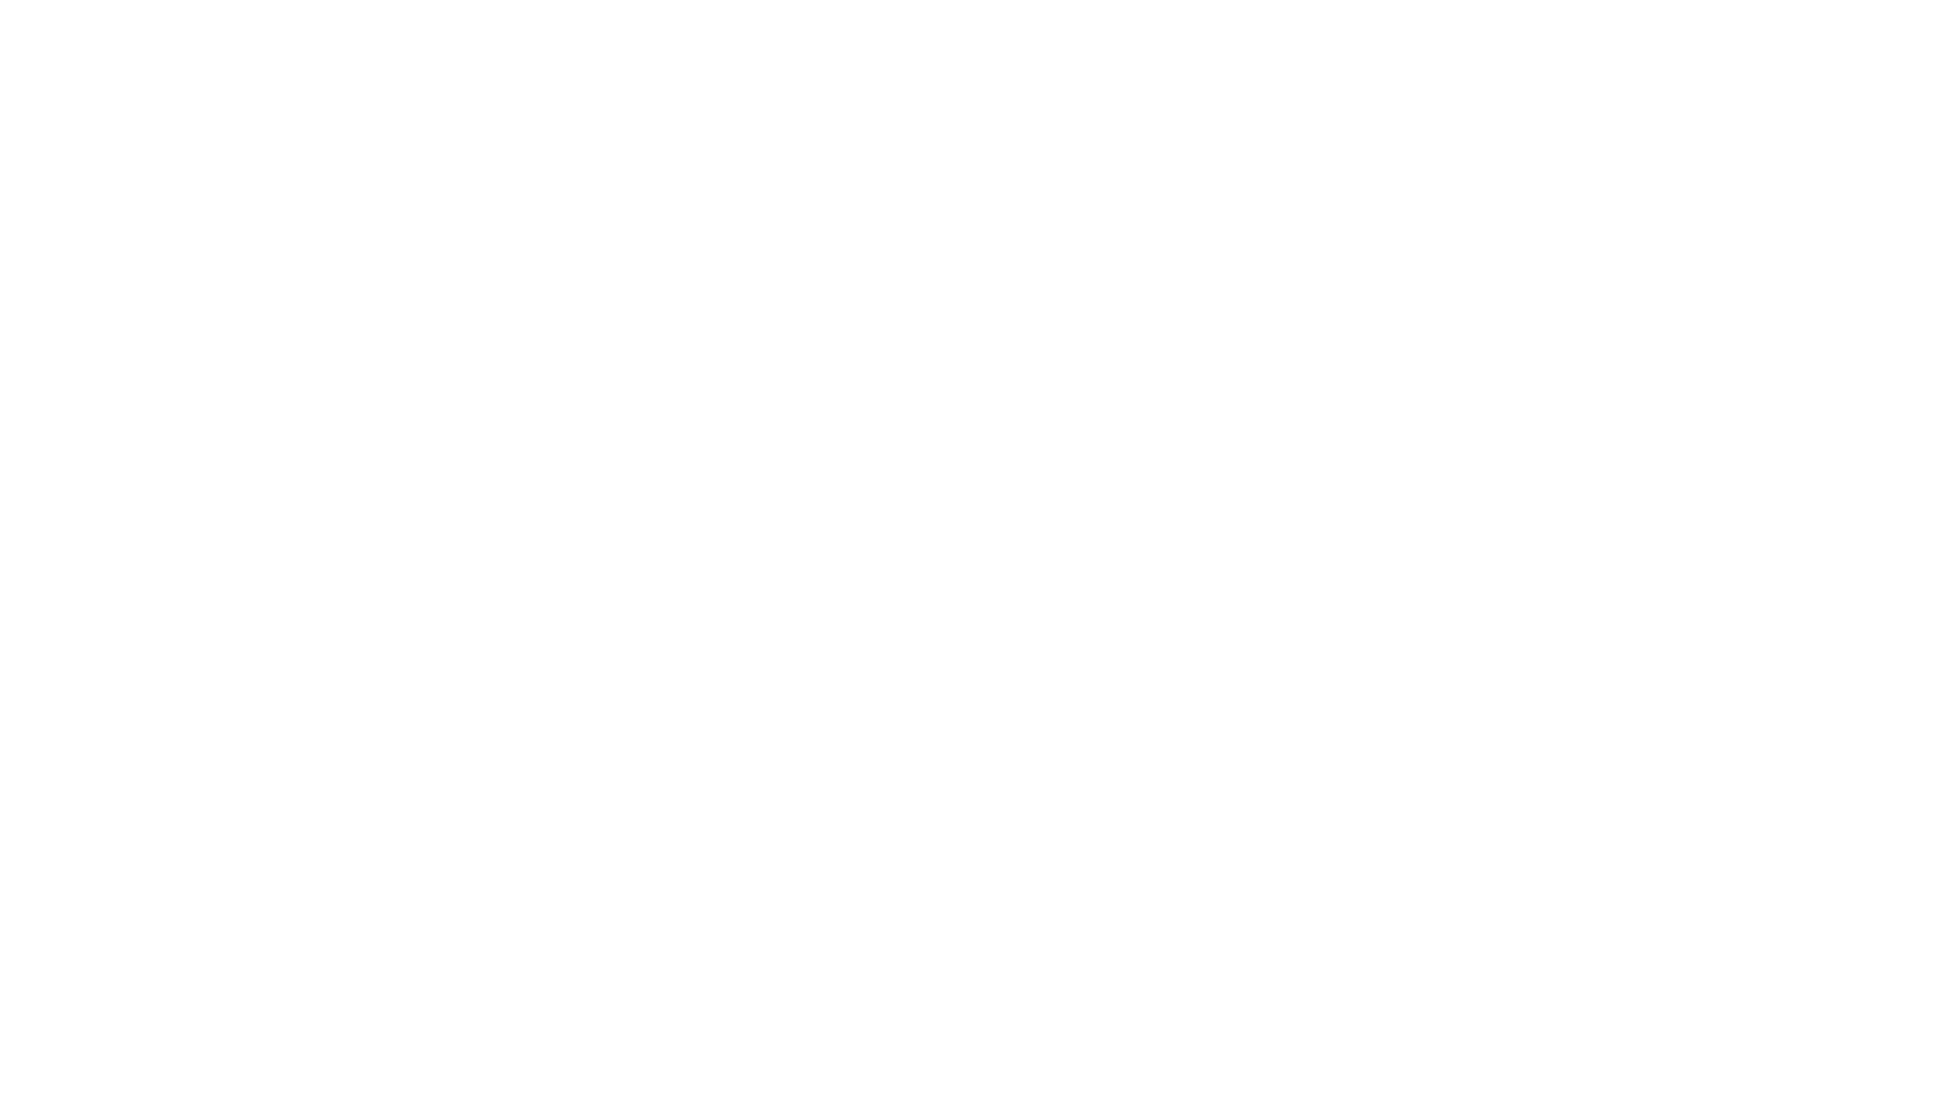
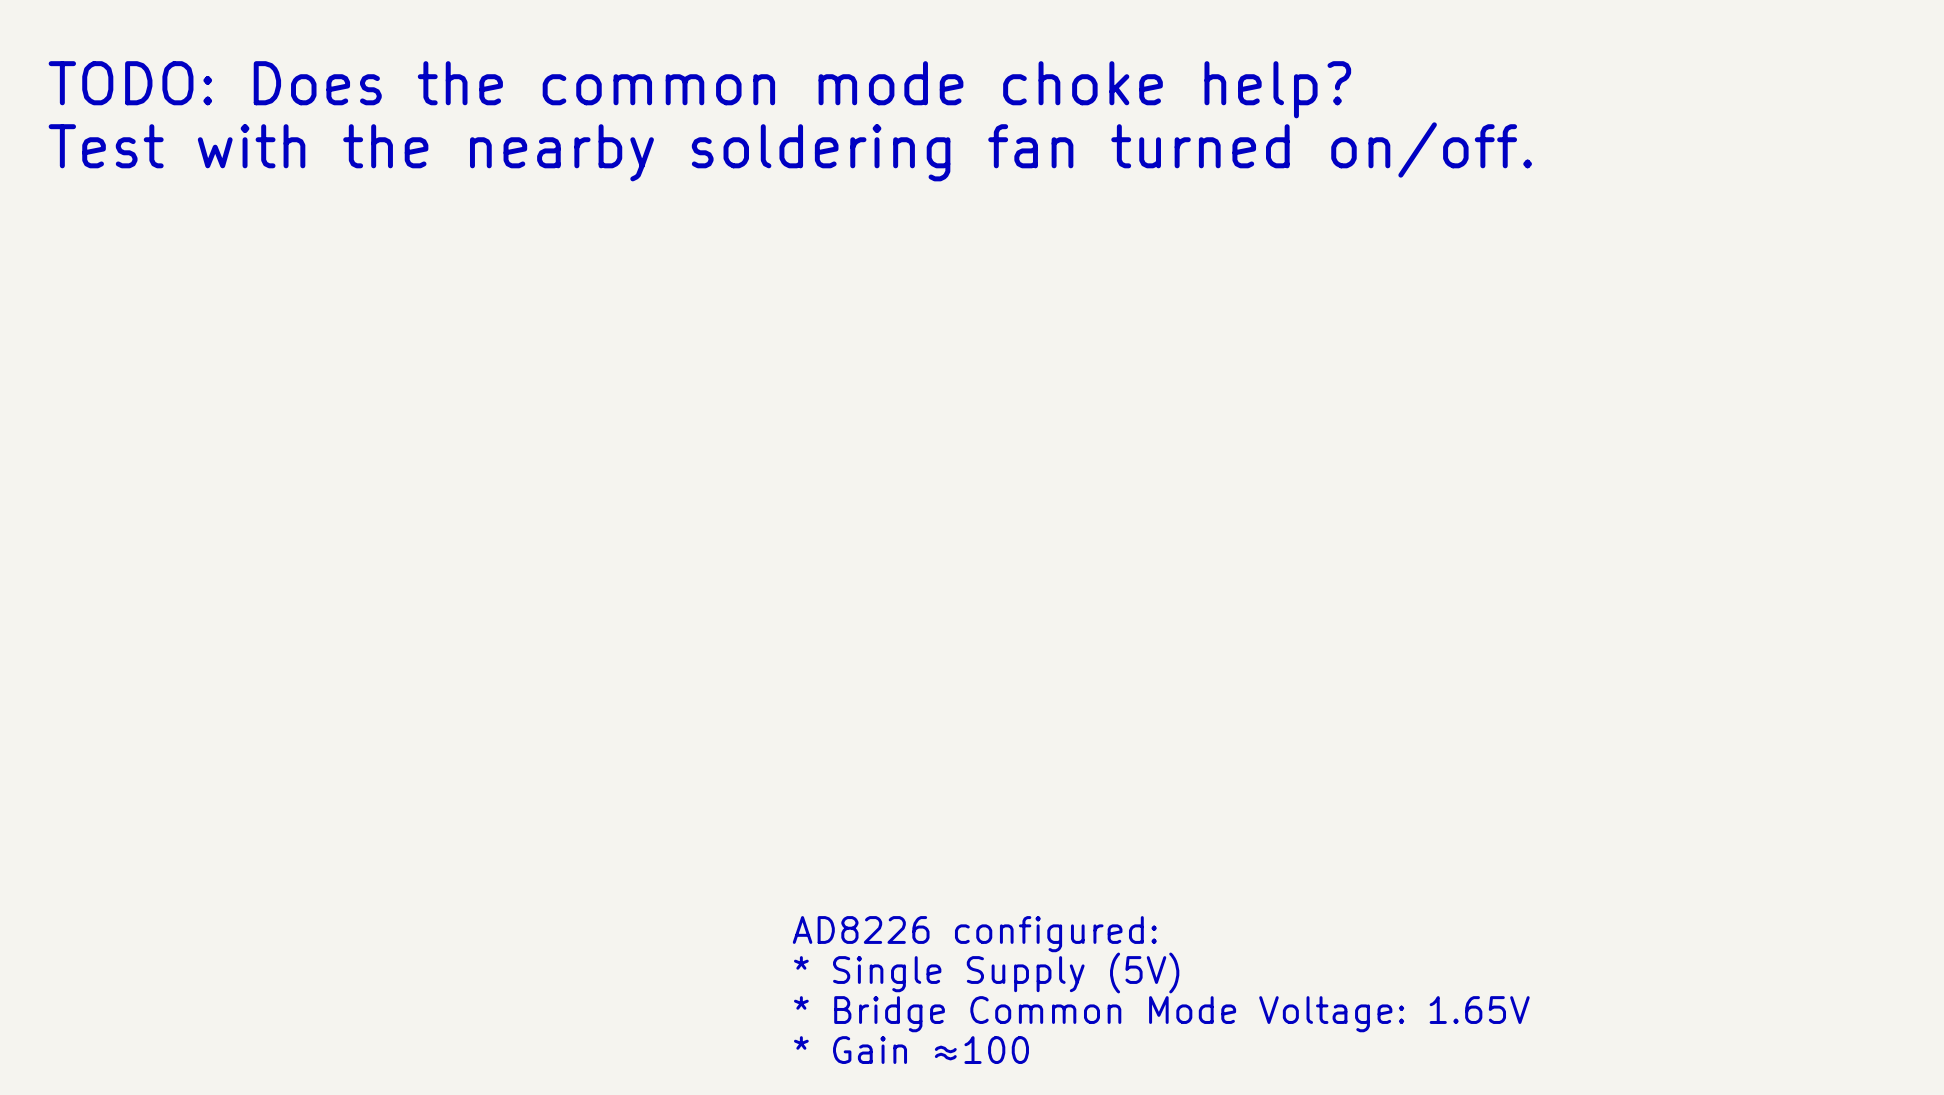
text: none -> TODO: Does the common mode choke help? (699, 89)
text: none -> Test with the nearby soldering fan turned on/off. (790, 151)
text: none -> AD8226 configured: (974, 934)
text: none -> * Single Supply (5V) (986, 972)
text: none -> * Bridge Common Mode Voltage: 1.65V (1161, 1014)
text: none -> * Gain ≈100 (911, 1050)

